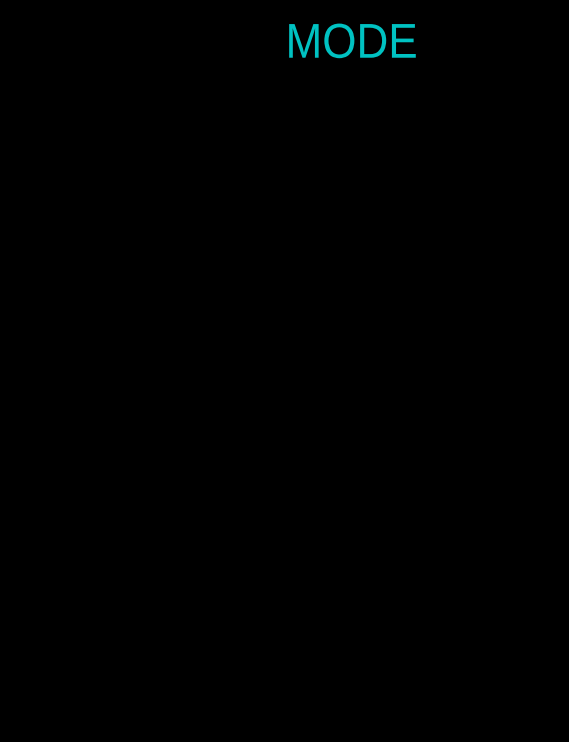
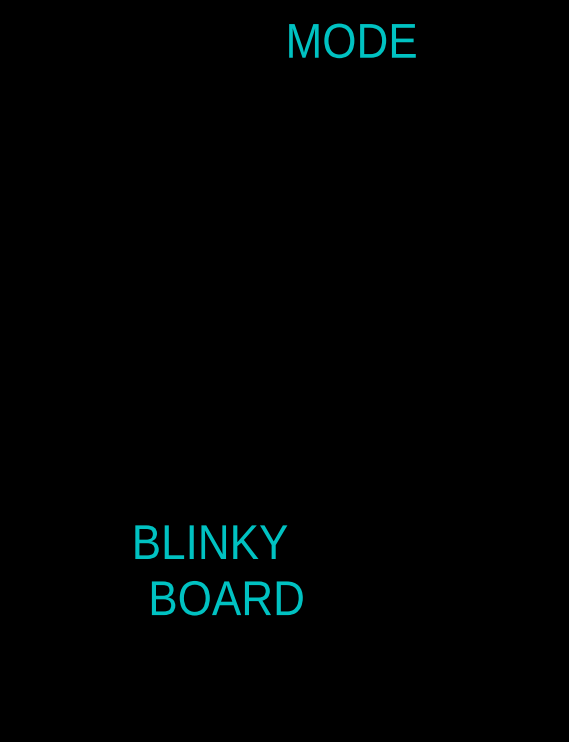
text: none -> BLINKY (211, 542)
text: none -> BOARD (227, 598)

